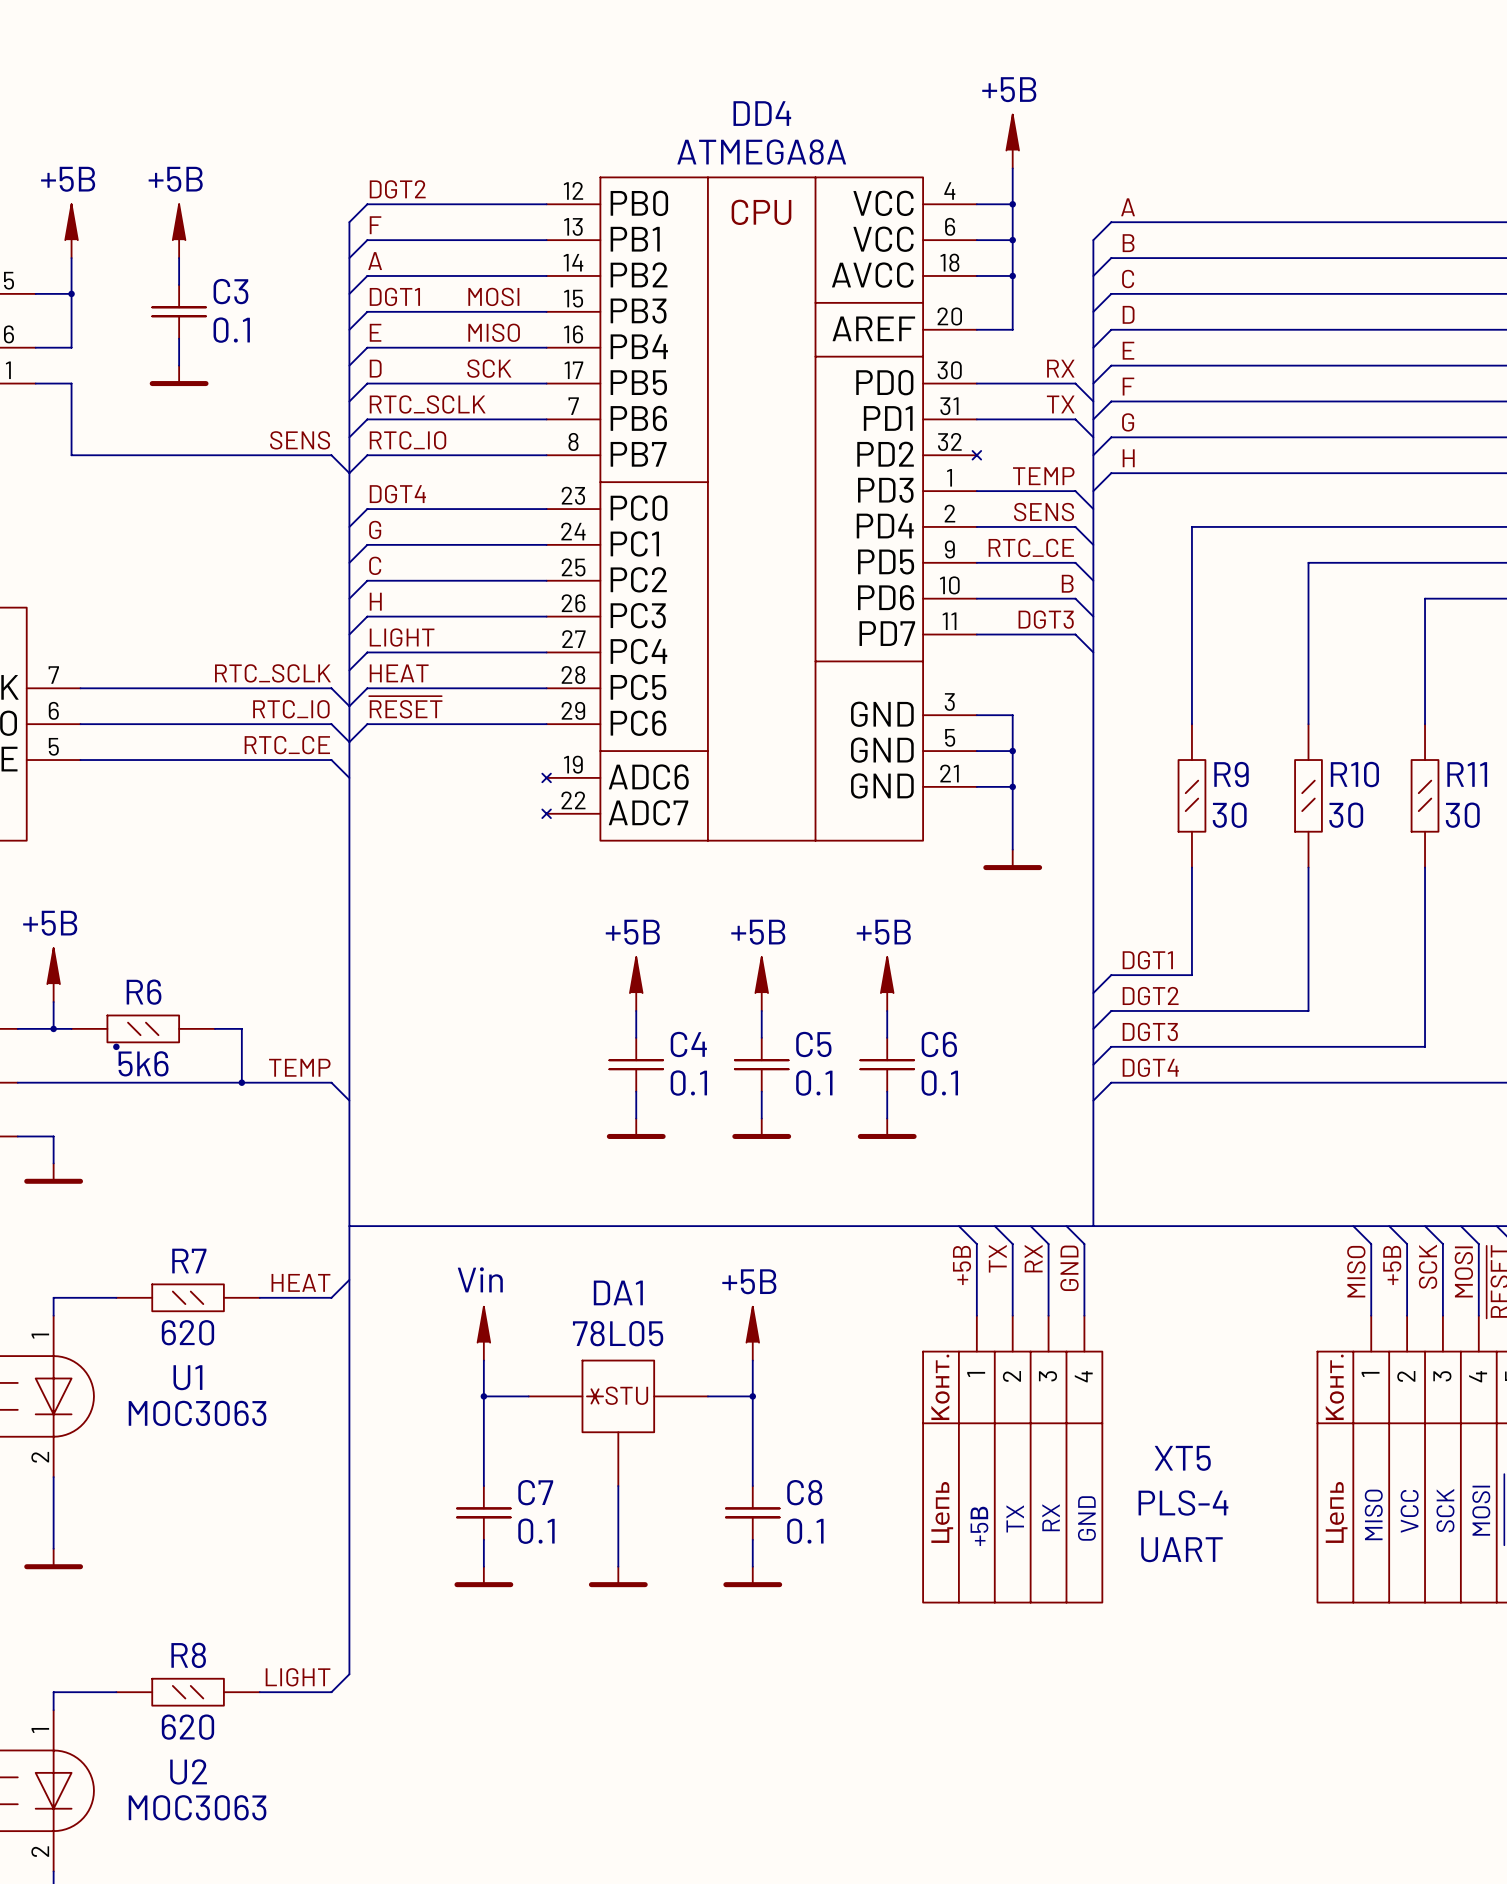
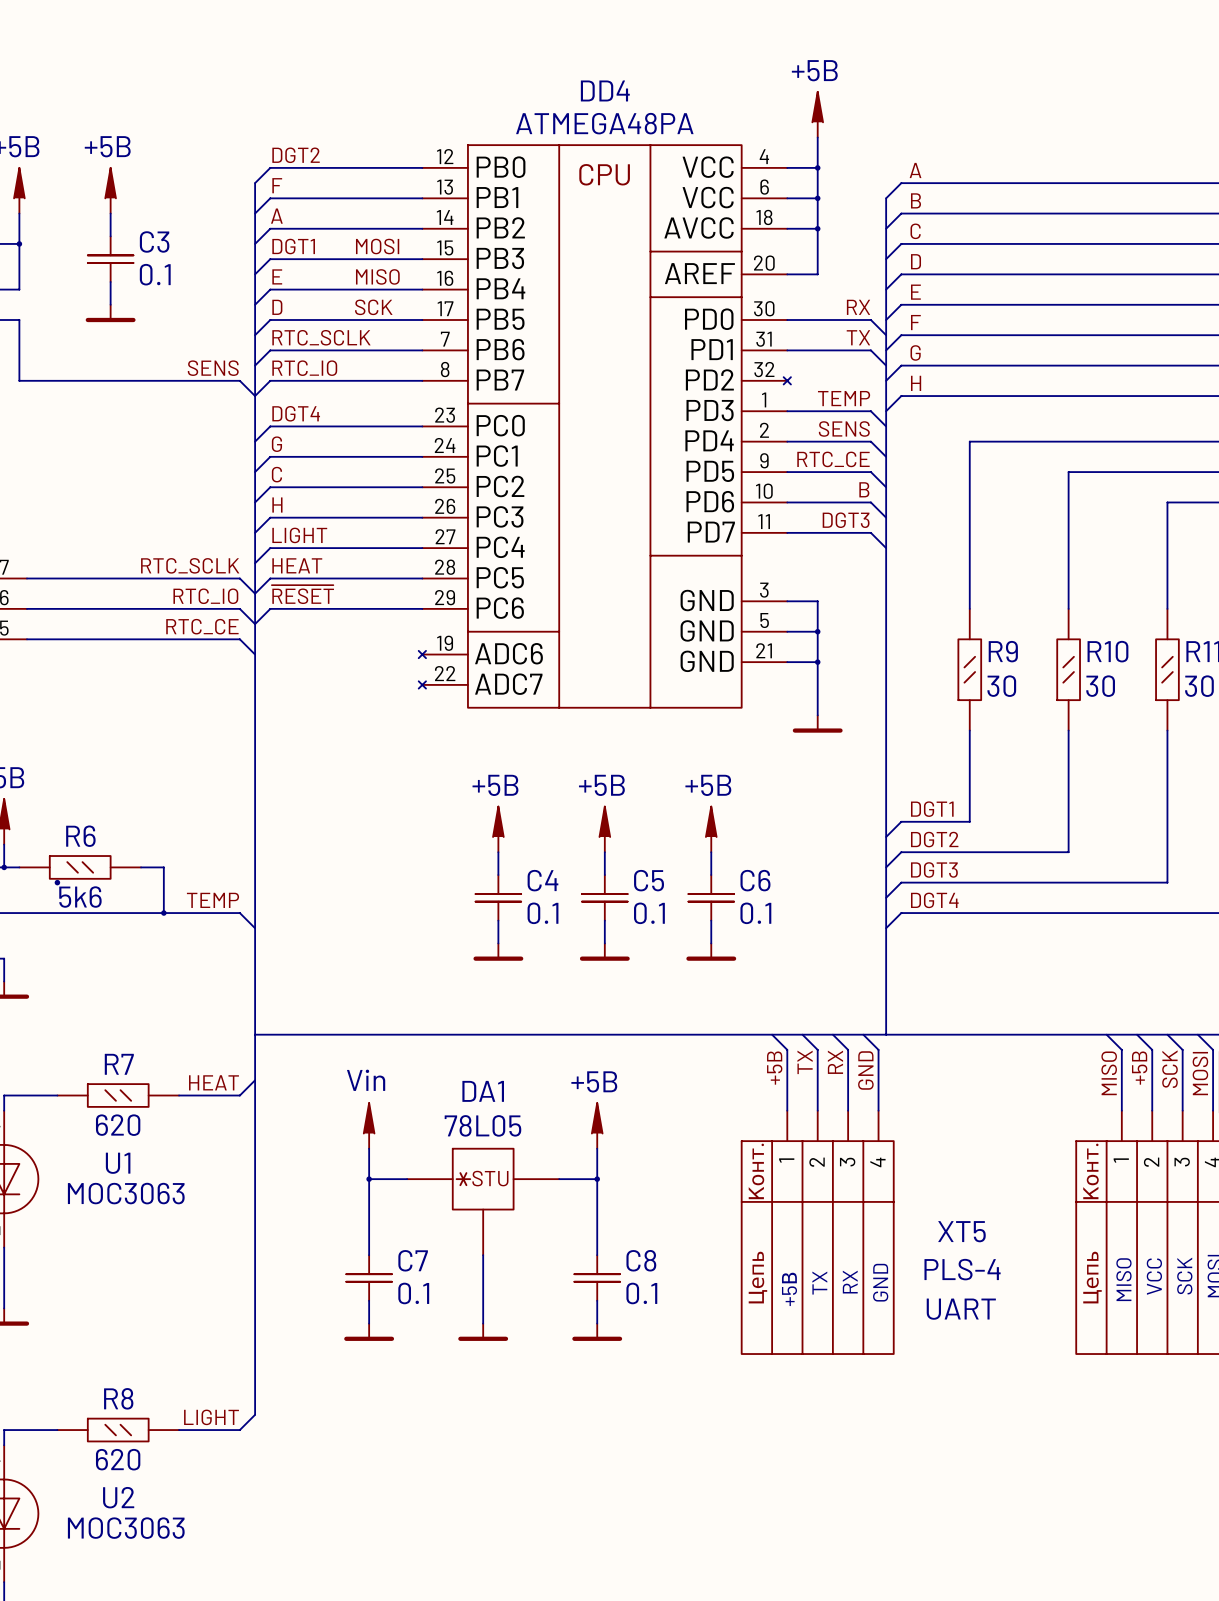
DD4 value: ATMEGA8A (761, 152) -> ATMEGA48PA (604, 123)

